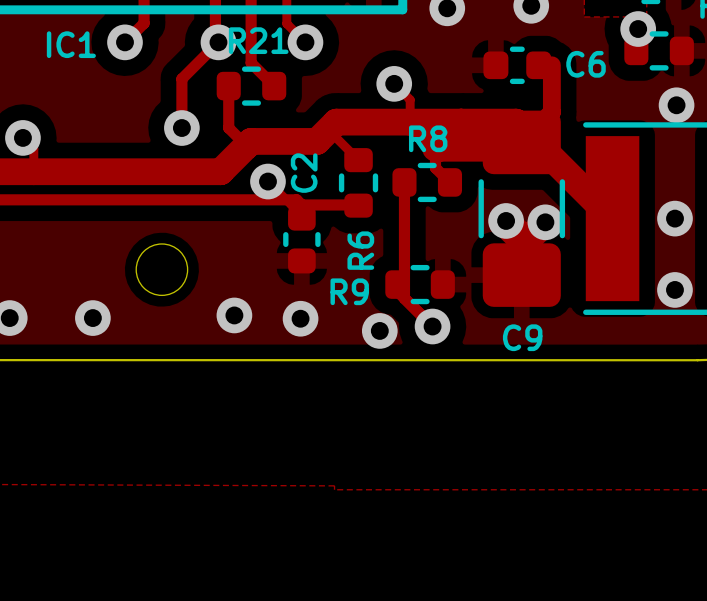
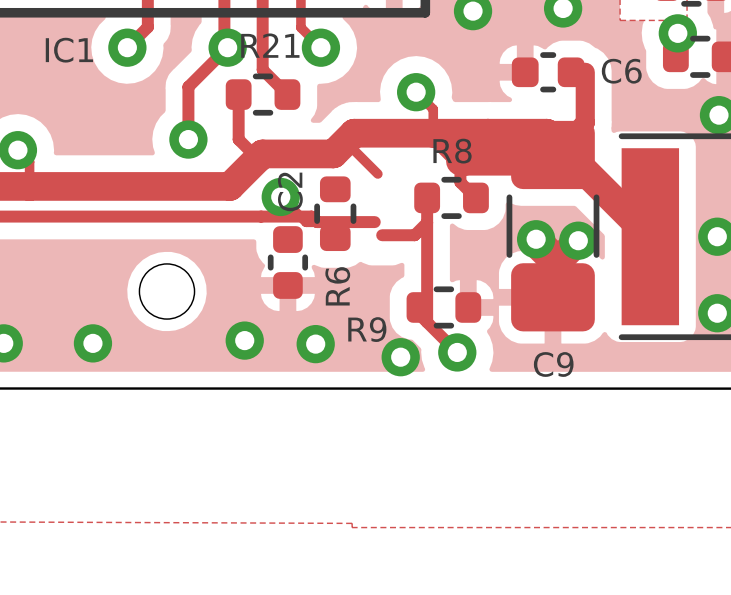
R6 position: (358, 182) -> (335, 213)
track: none -> (427, 222) (414, 235) (382, 235)
C2 position: (301, 239) -> (287, 262)
R9 name position: R9 (349, 291) -> R9 (367, 329)

